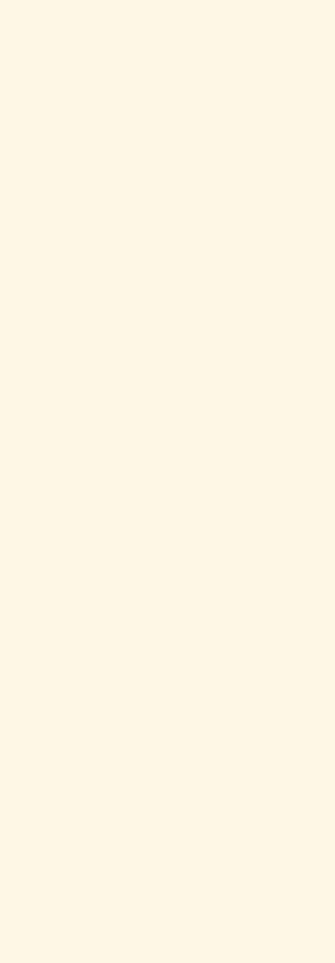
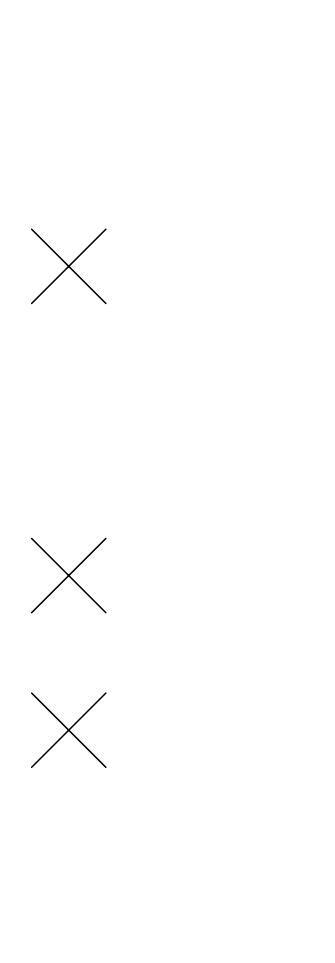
no-connect mark: none -> (68, 266)
no-connect mark: none -> (68, 575)
no-connect mark: none -> (68, 730)

